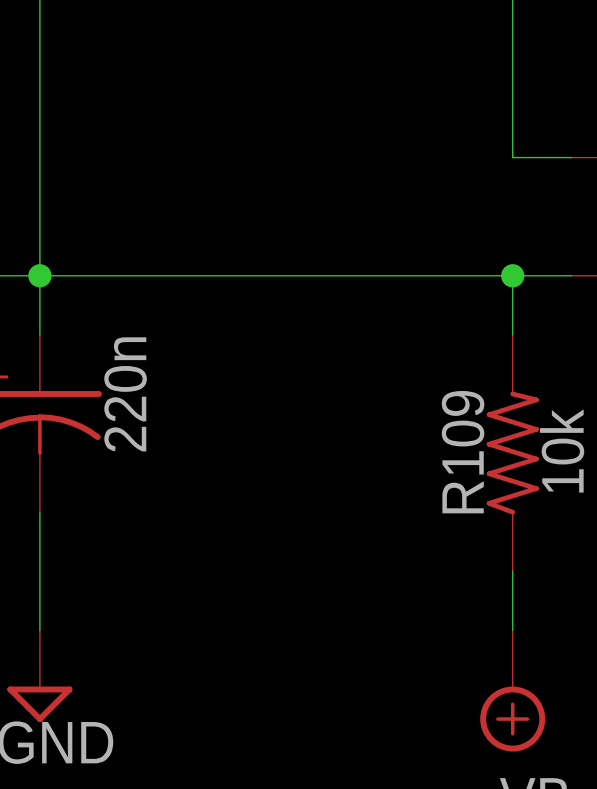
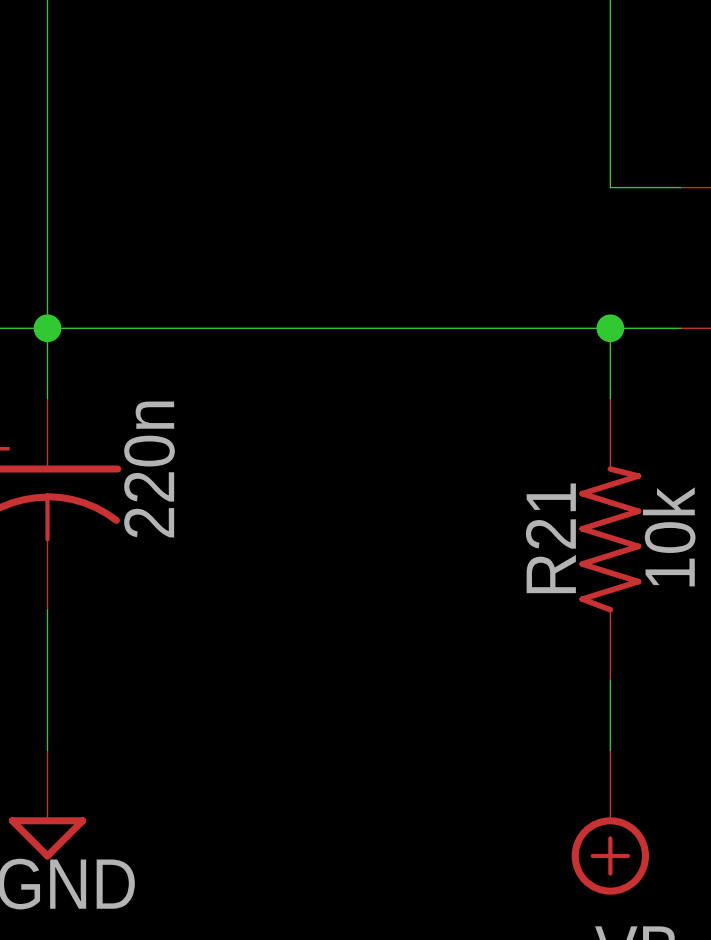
R109 name: R109 (463, 452) -> R21 (550, 538)

